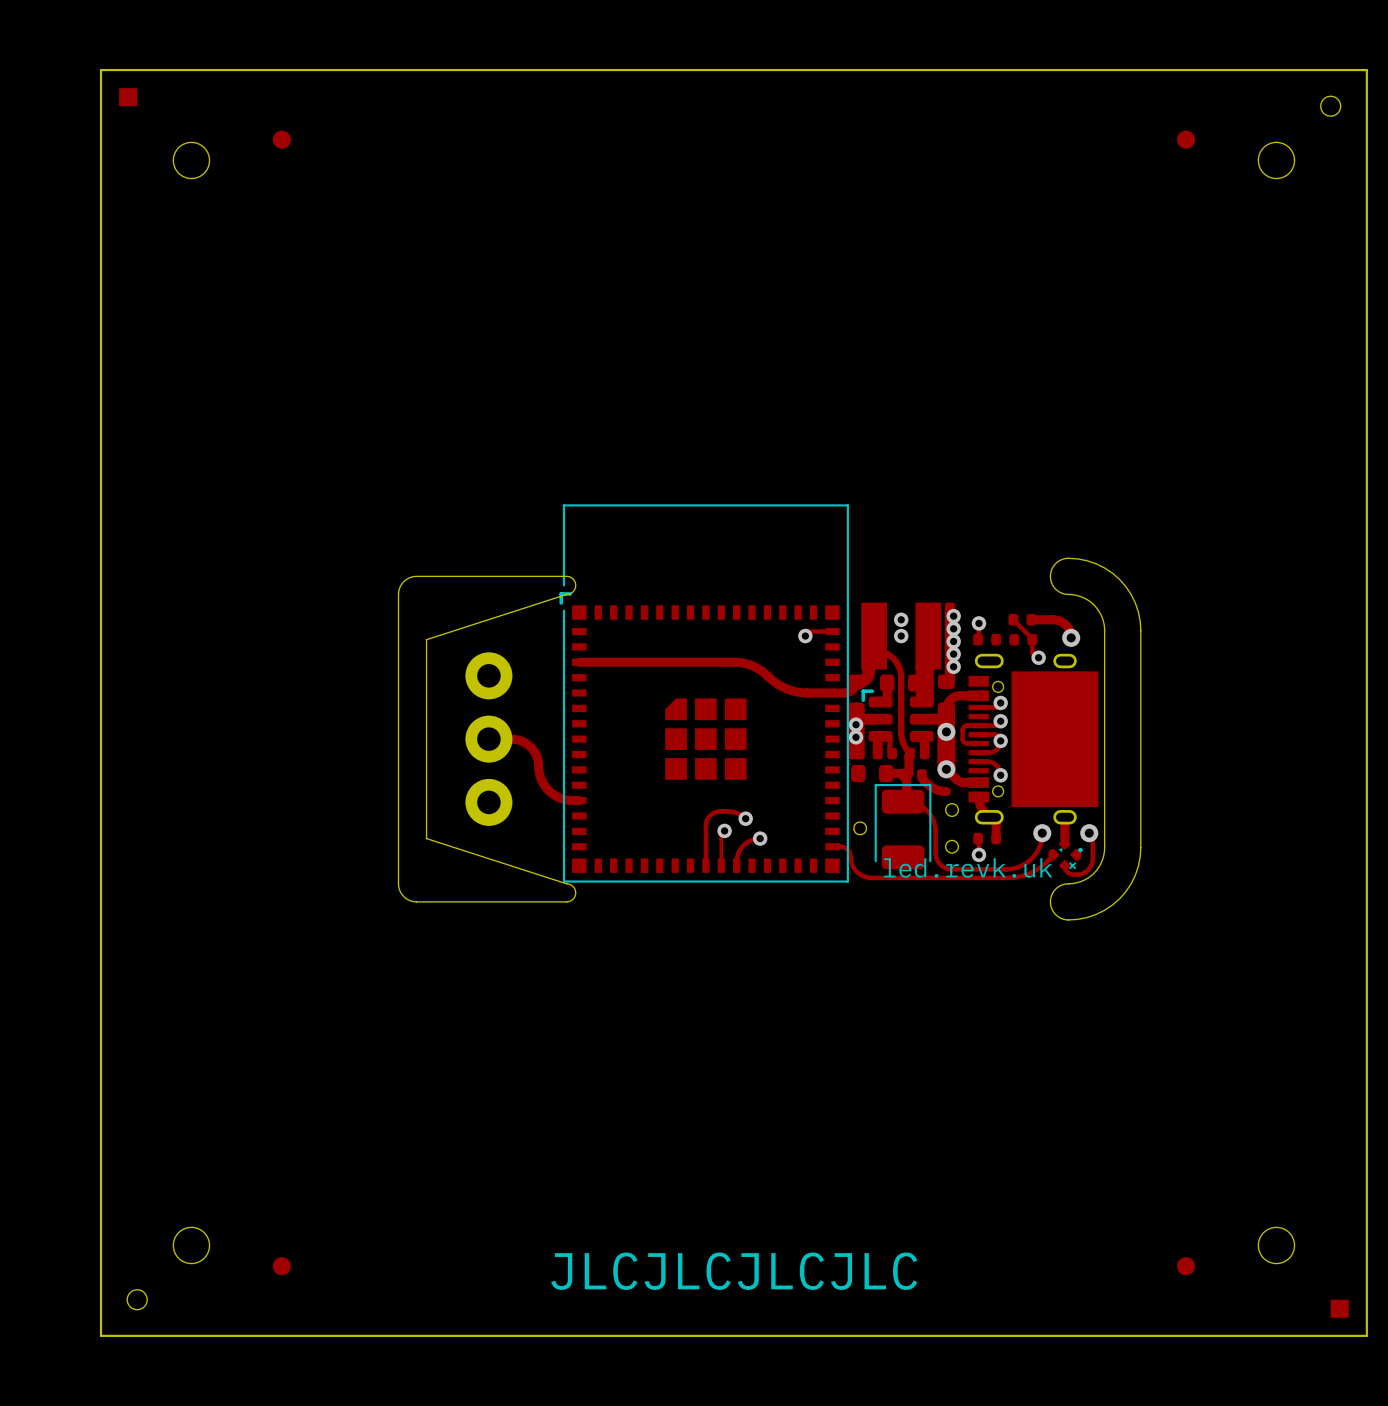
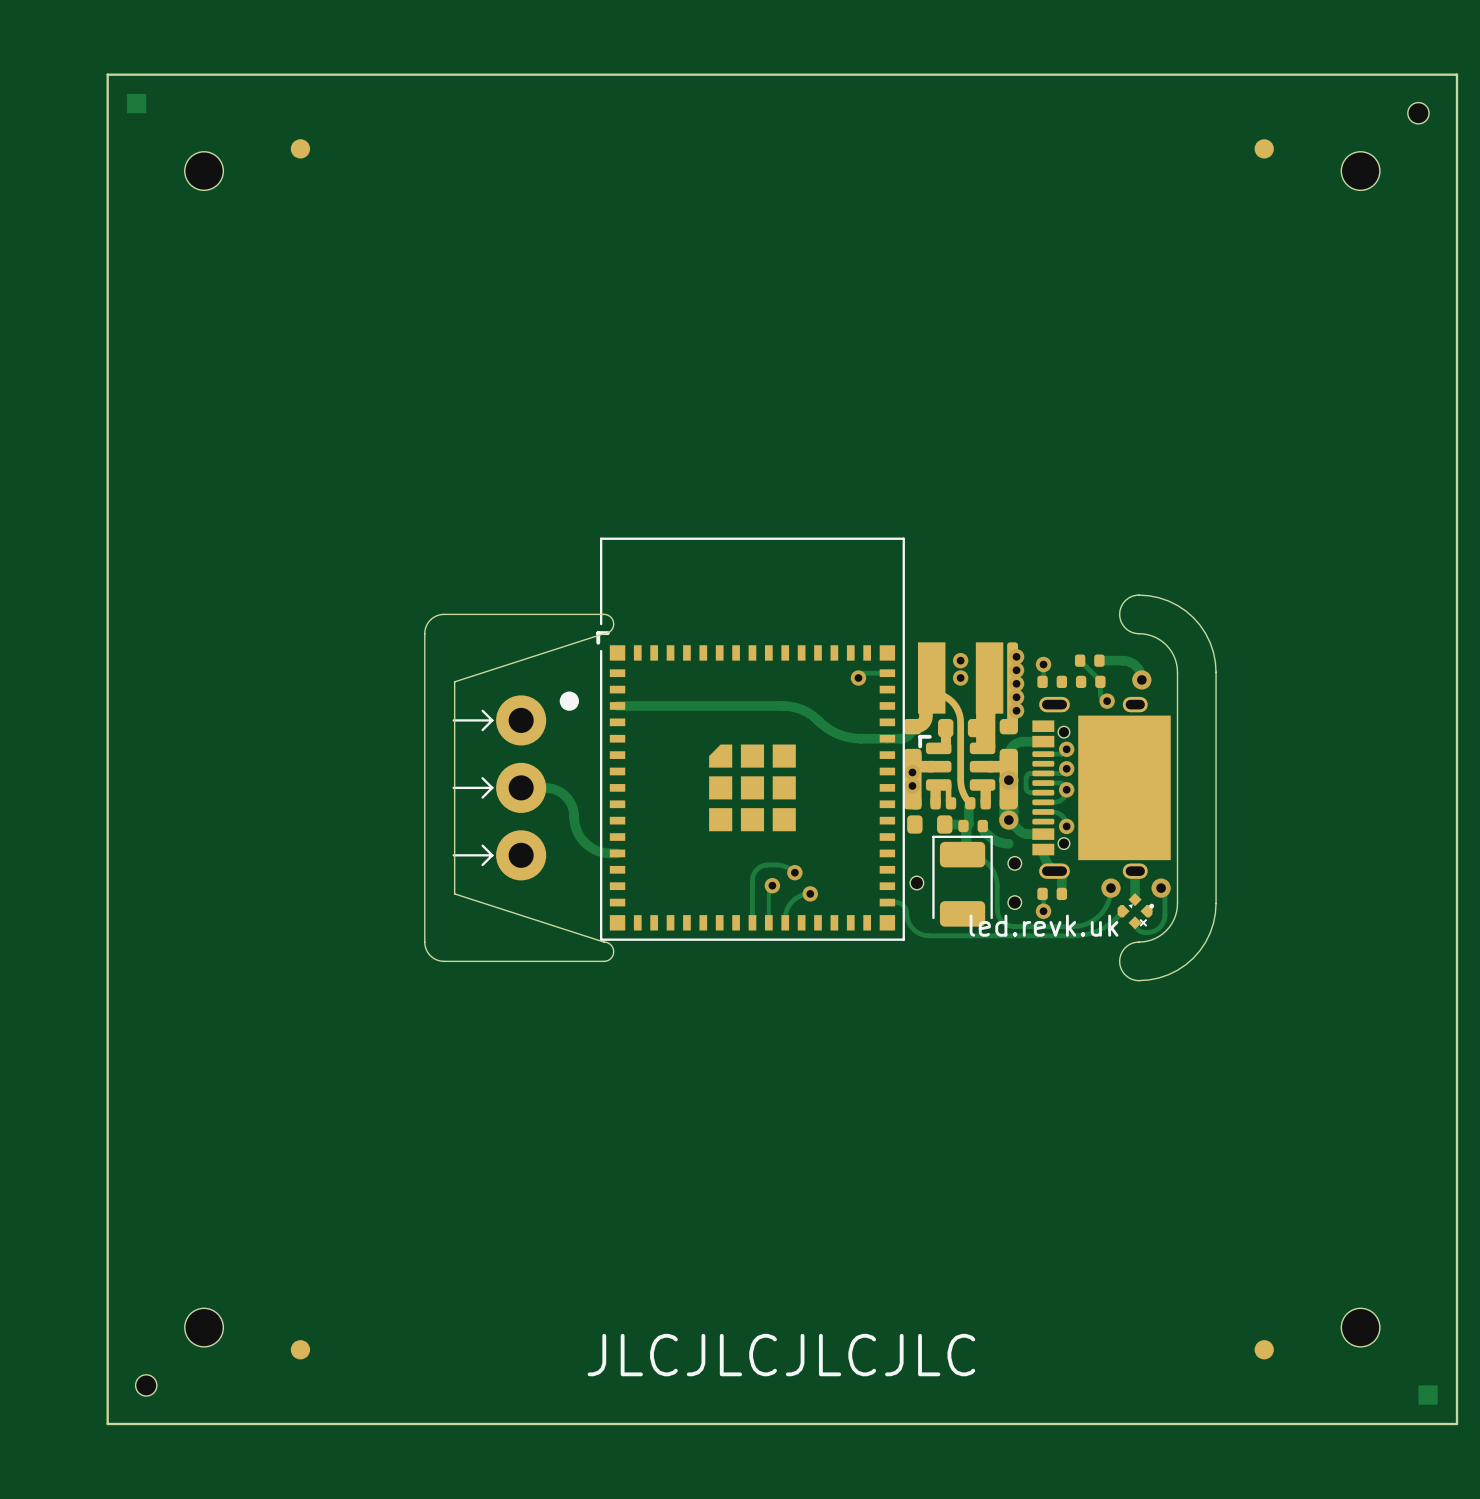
part footprint: [465, 652, 513, 826] -> [452, 691, 579, 881]

